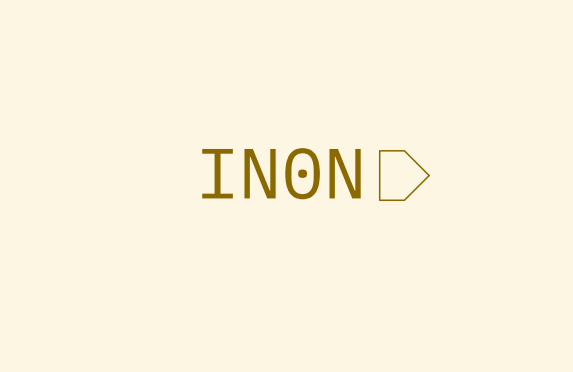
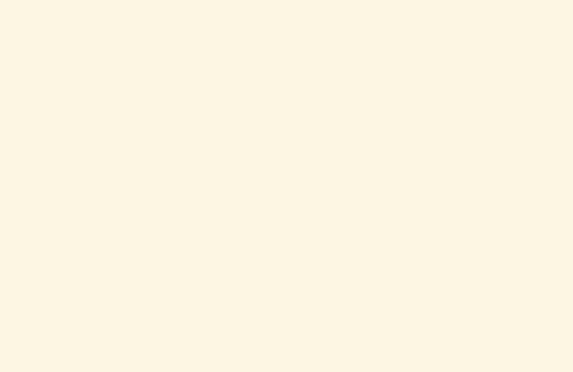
hierarchical label: IN0N (281, 173) -> none

